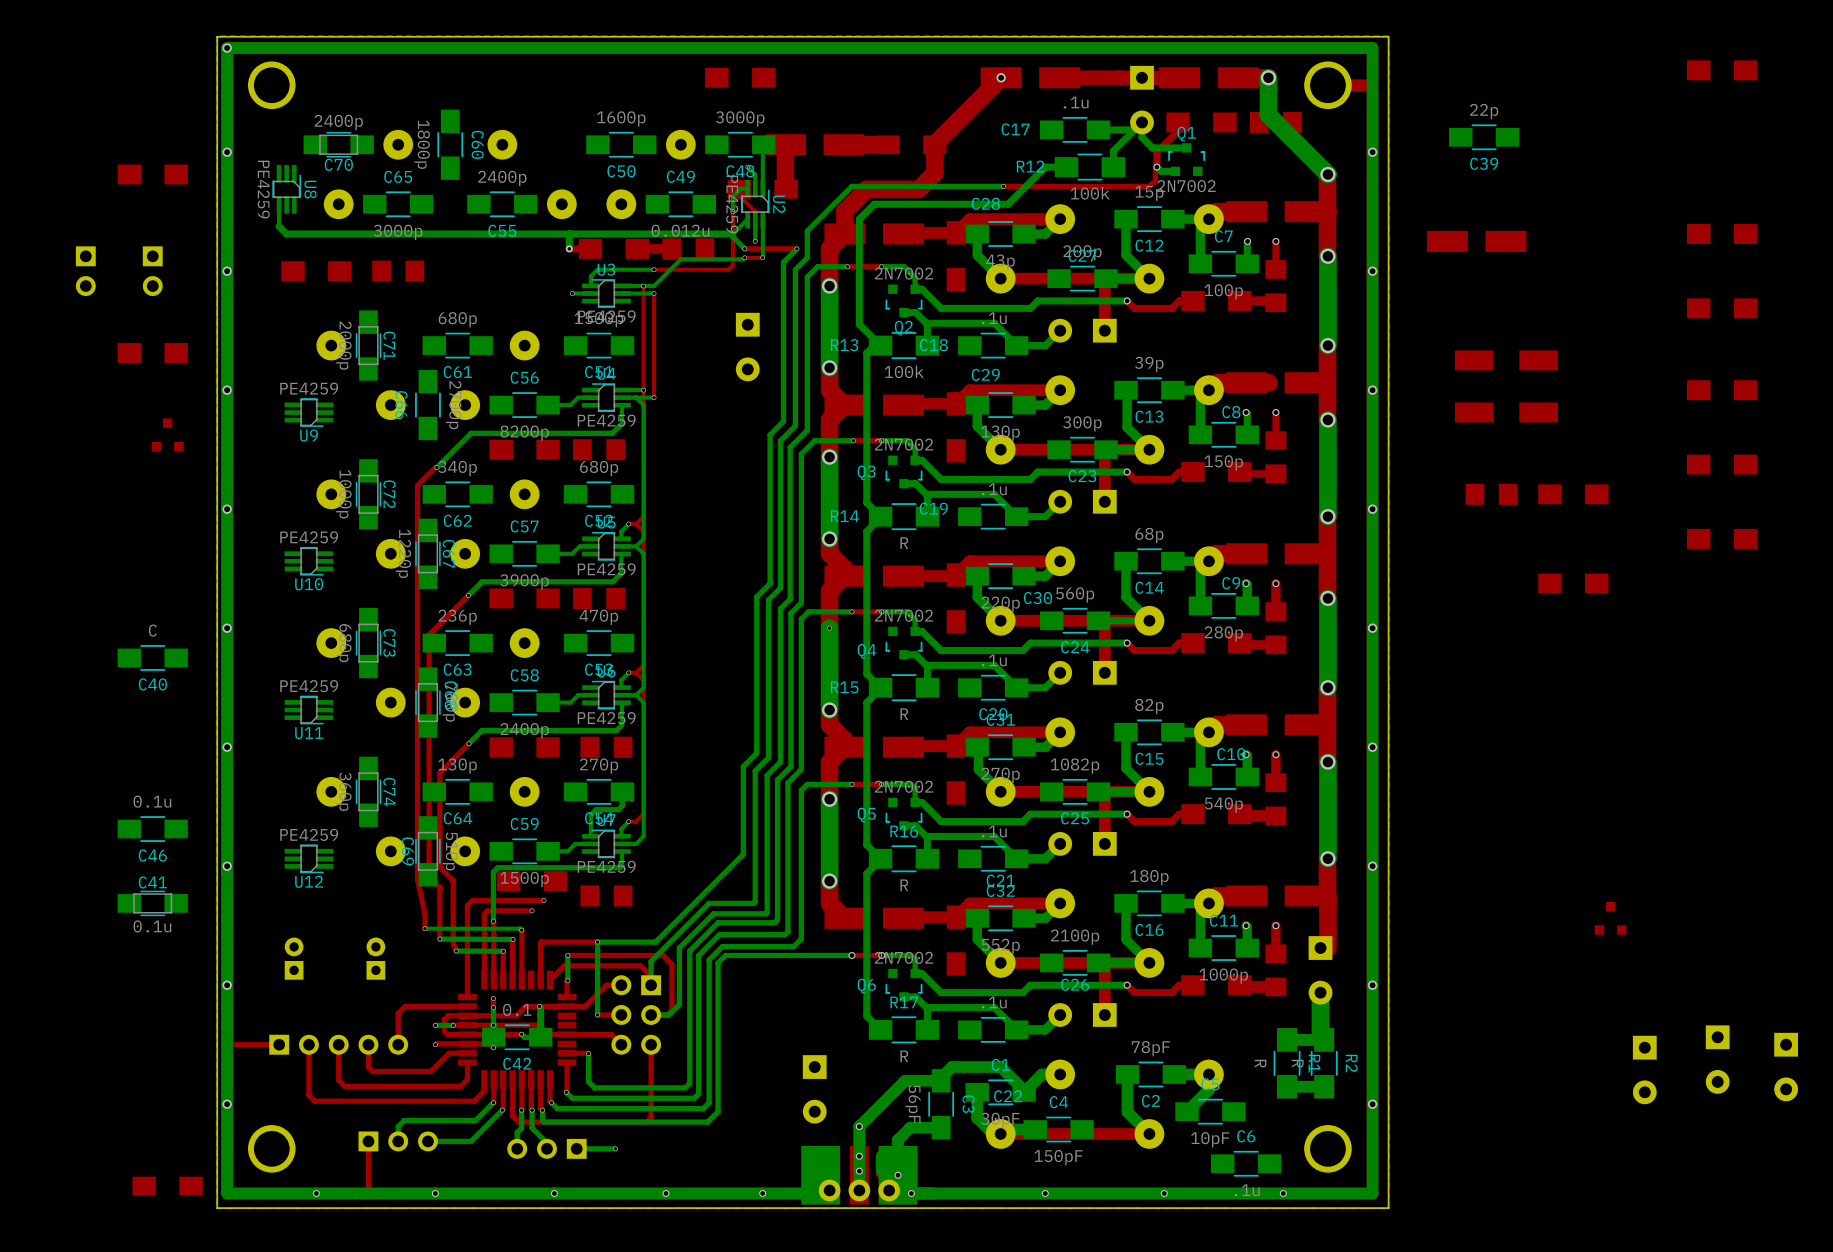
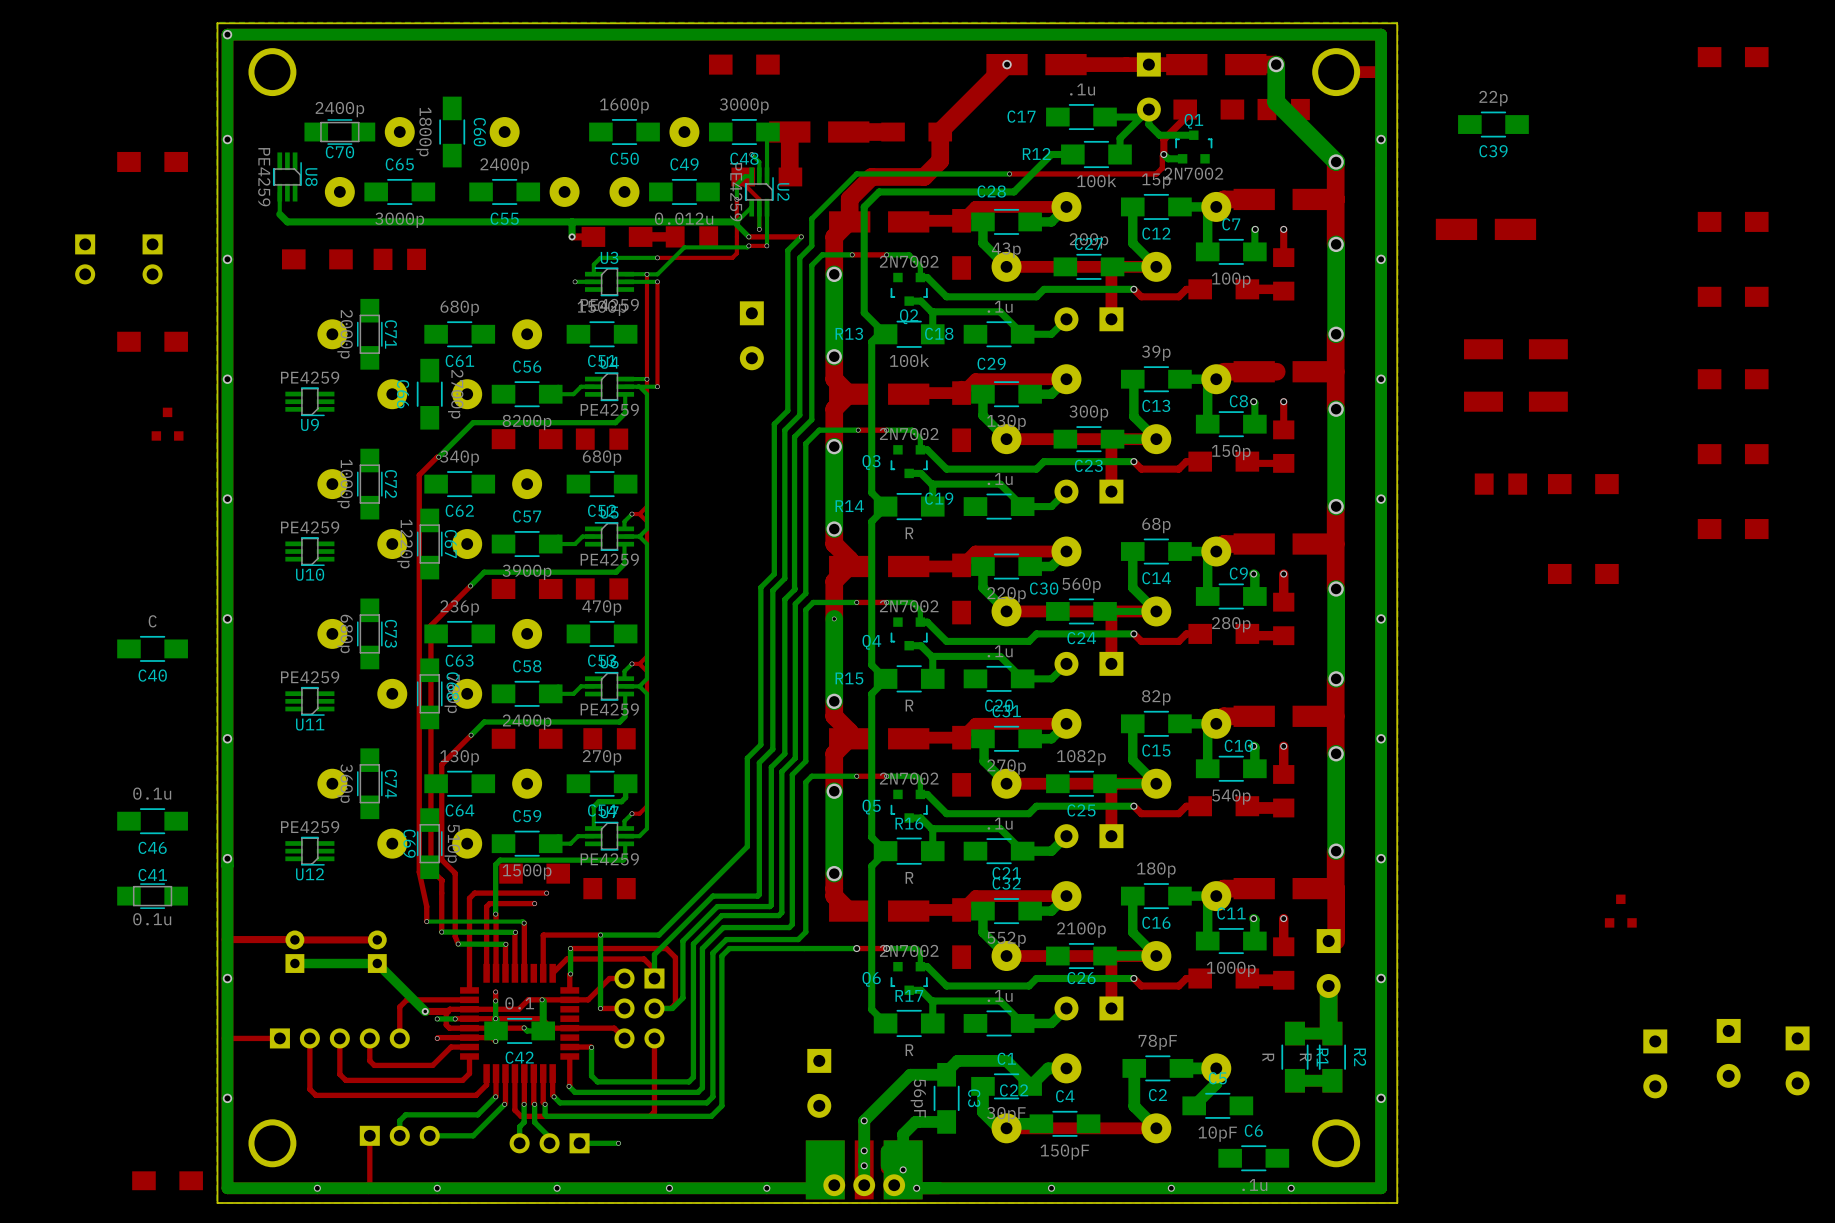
top track: none -> (227, 939) (377, 939)
bottom track: none -> (294, 963) (377, 963) (425, 1011)
via: none -> (425, 1011)
top track: none -> (447, 1011) (425, 1011)

